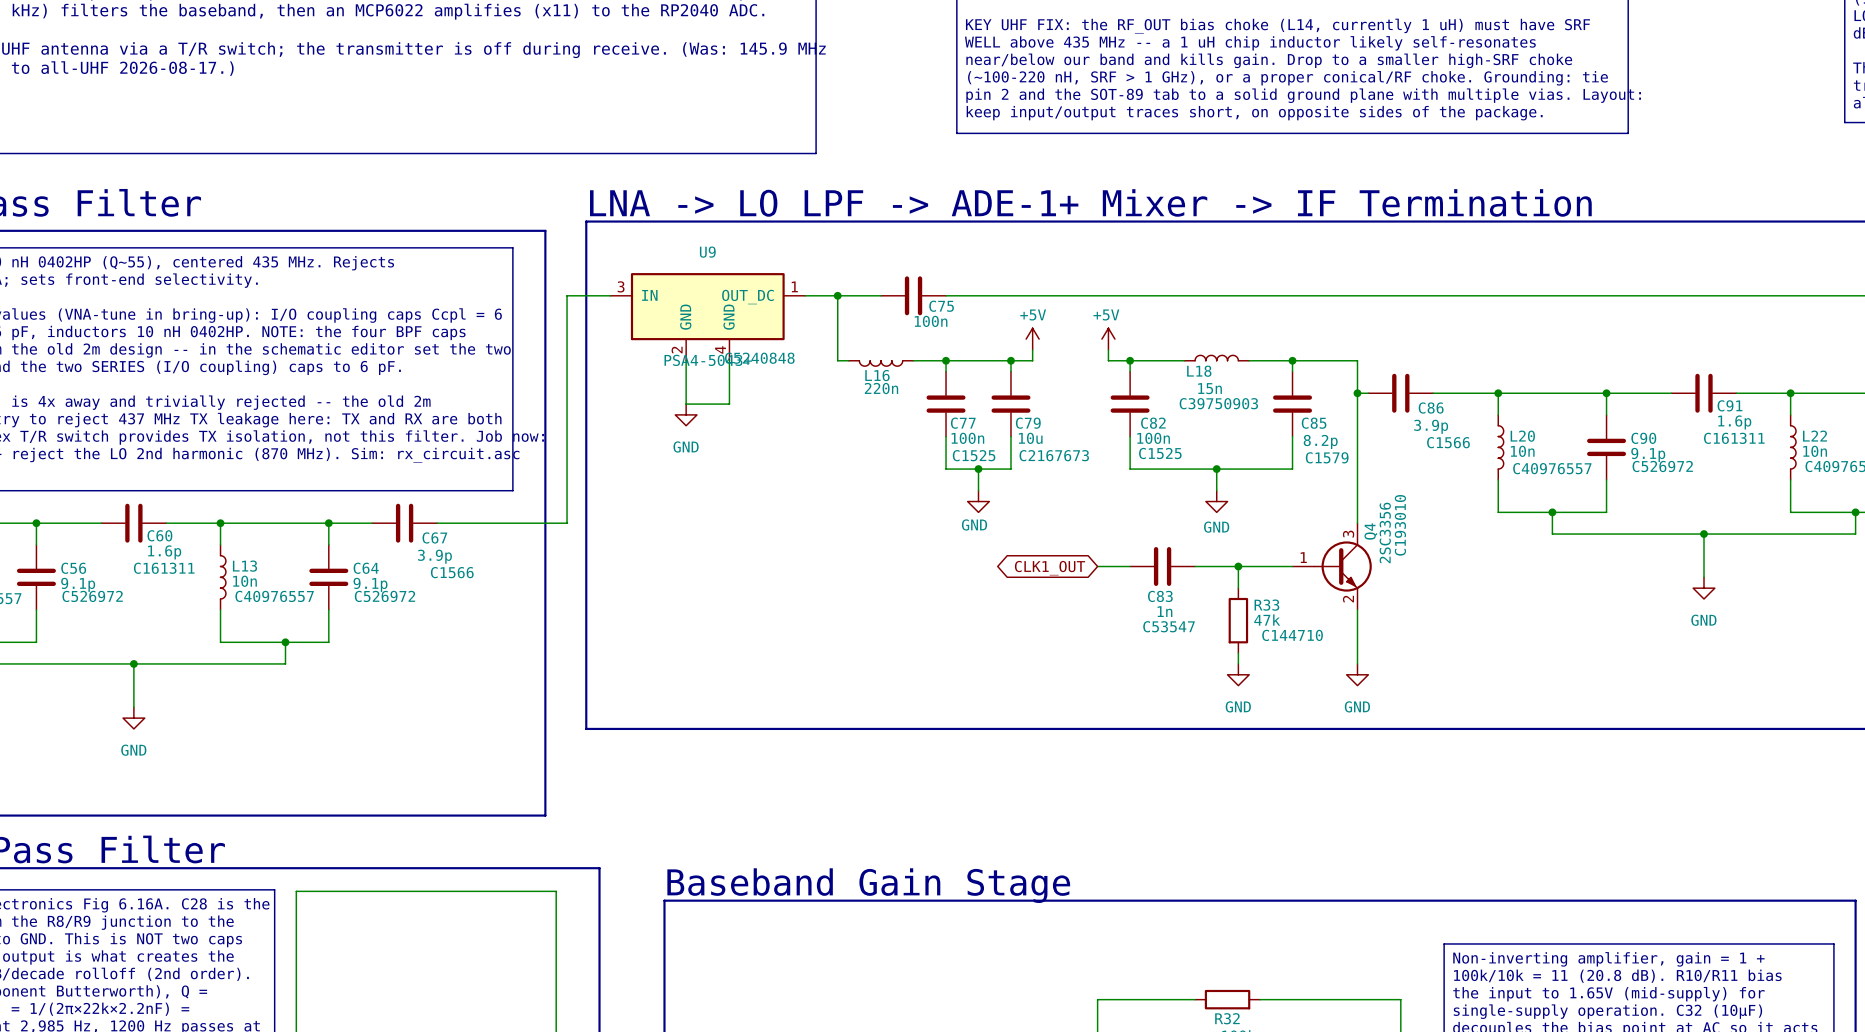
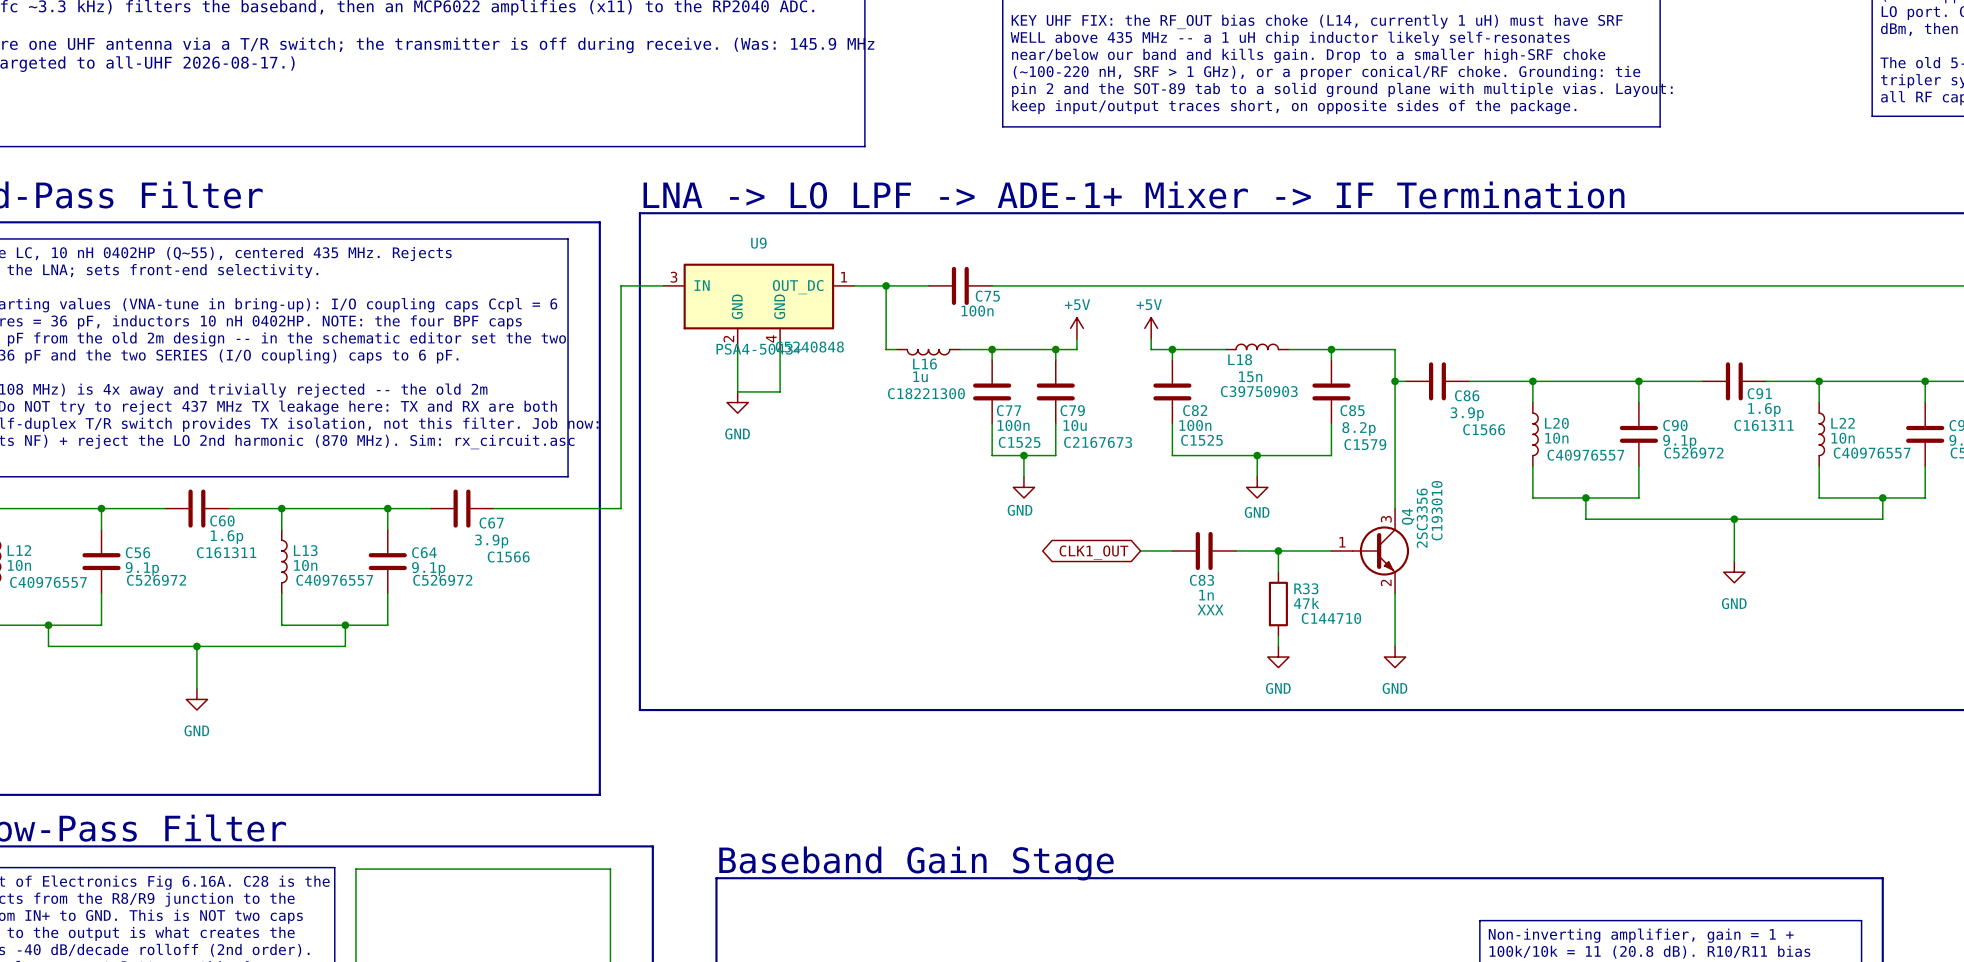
L16 value: 220n (881, 388) -> 1u (920, 376)
L16 text: none -> C18221300 (926, 393)
C83 text: C53547 (1169, 626) -> XXX (1210, 609)

